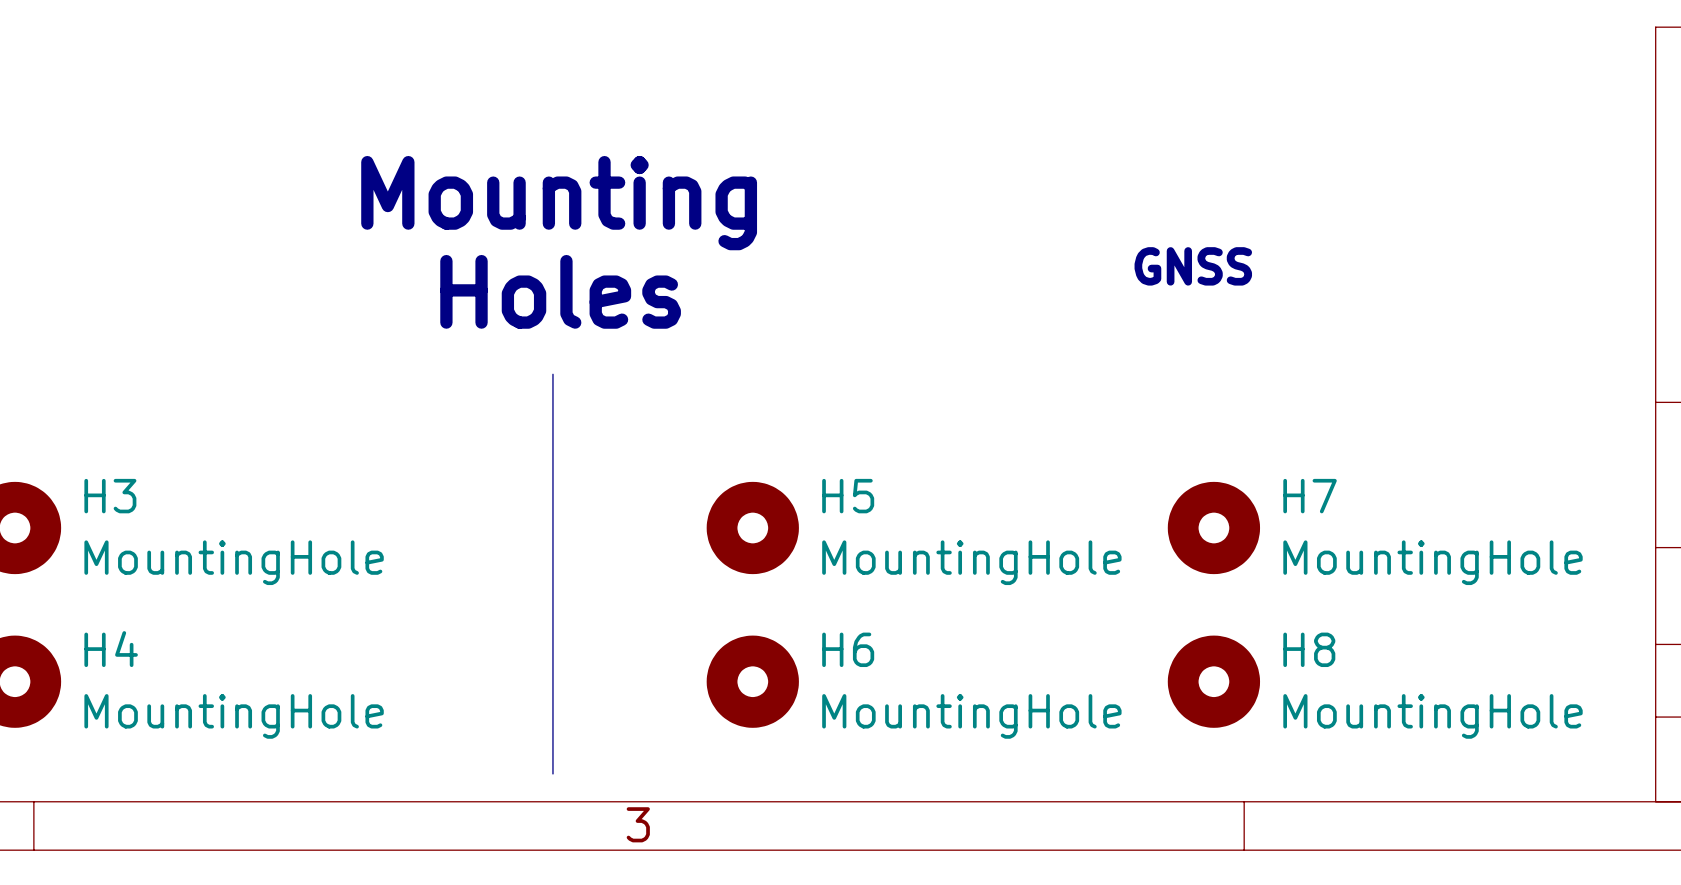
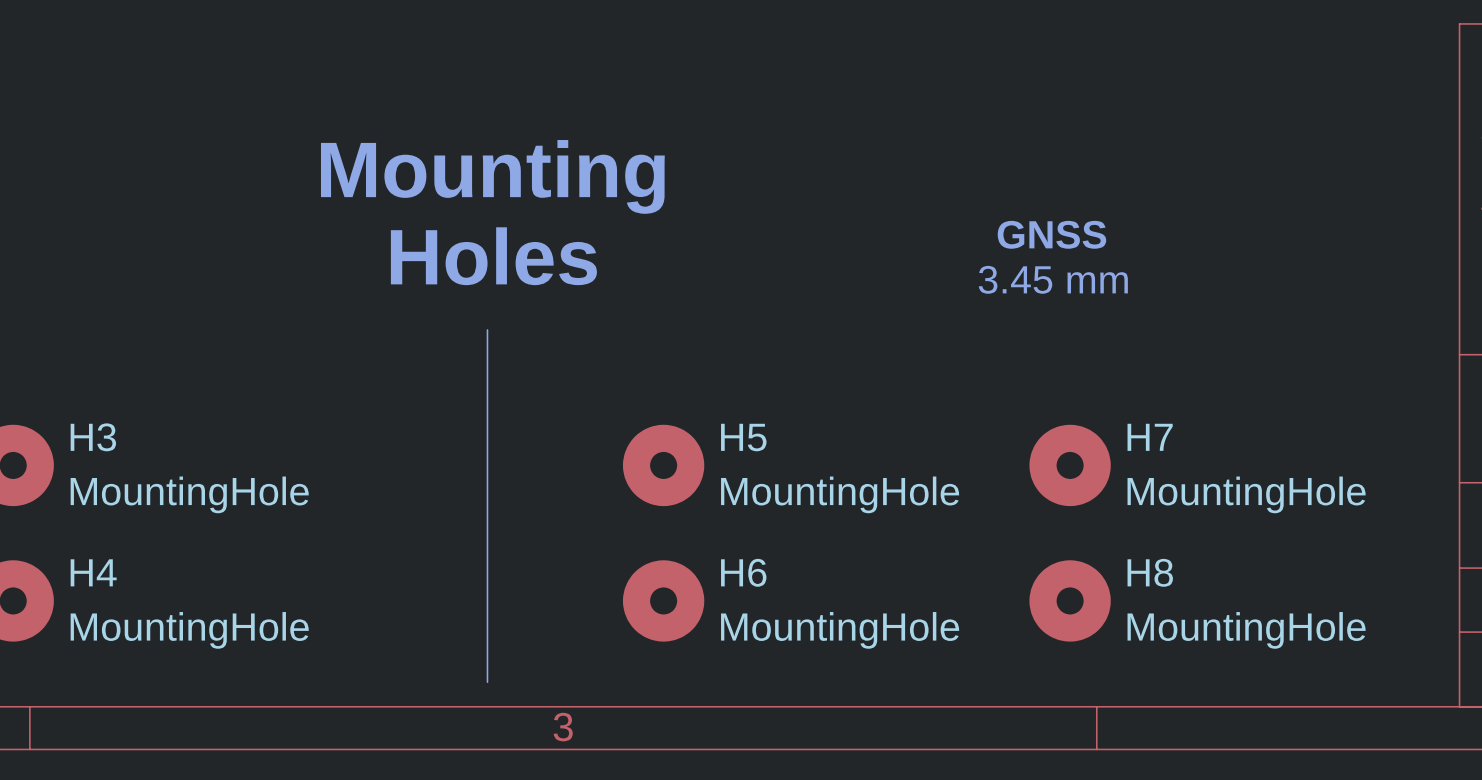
text: none -> 3.45 mm (1053, 279)

